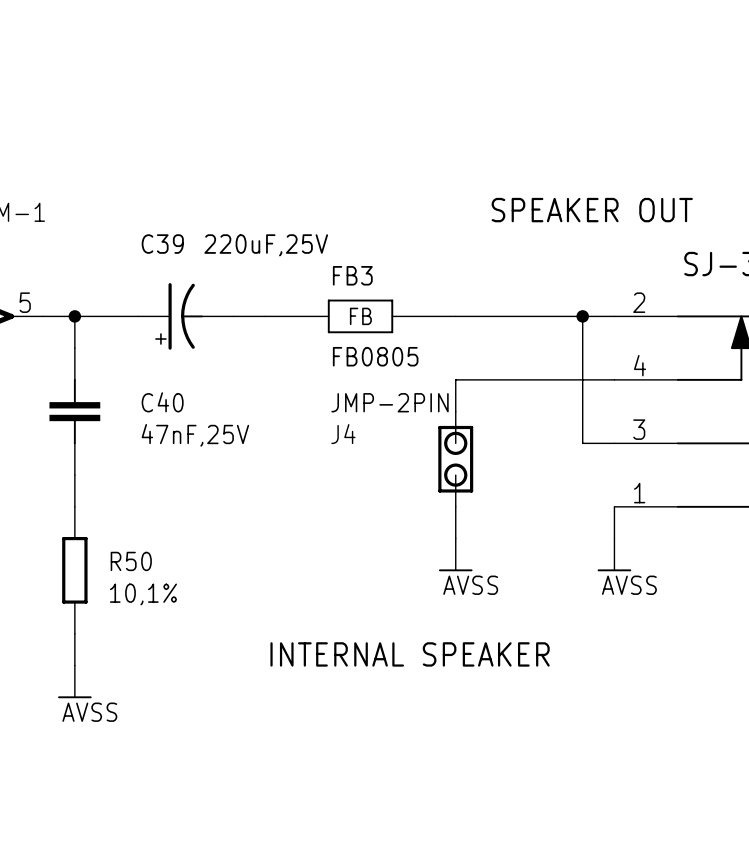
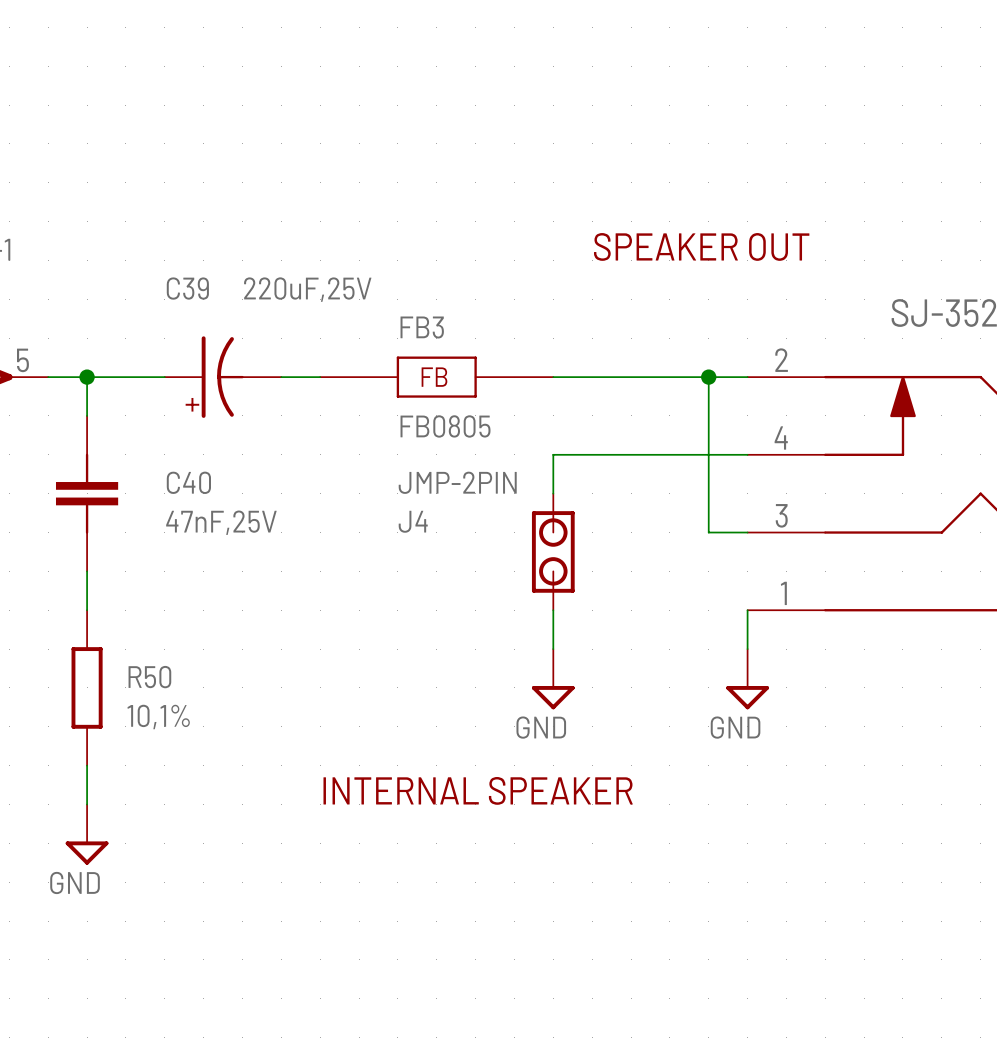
power symbol: AVSS (455, 554) -> GND (553, 679)
power symbol: AVSS (614, 554) -> GND (747, 679)
power symbol: AVSS (74, 681) -> GND (87, 834)

